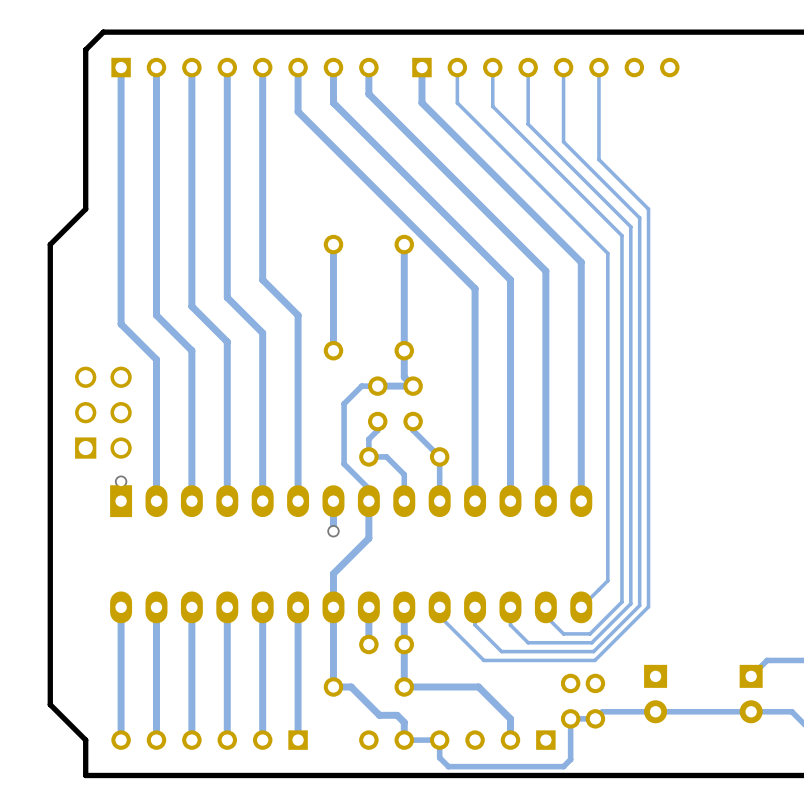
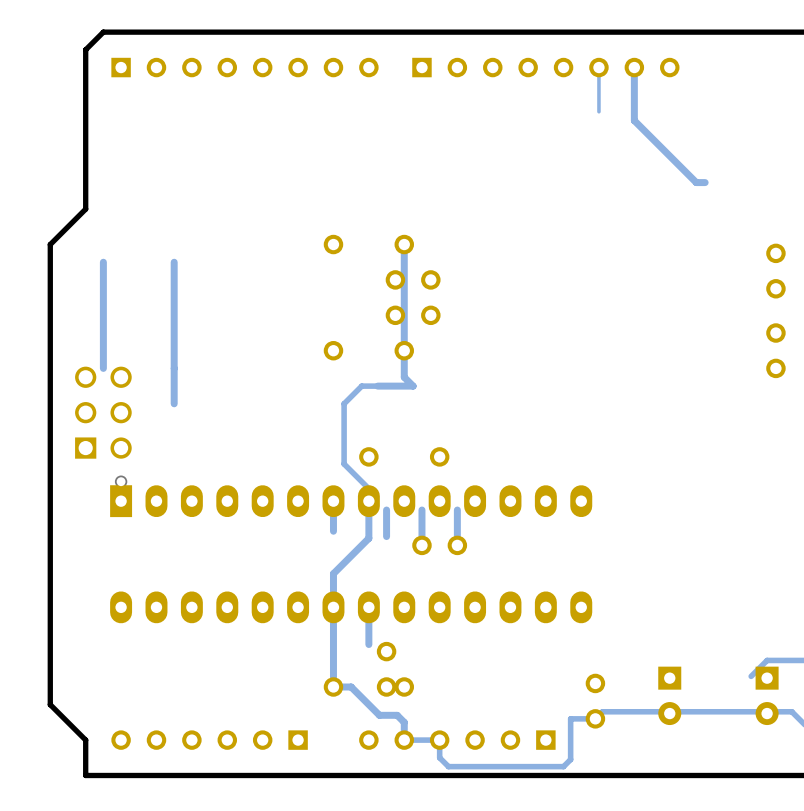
track: (121, 67) (121, 324) (156, 359) (156, 501) -> none
track: (156, 67) (156, 315) (191, 350) (191, 501) -> none
track: (191, 67) (191, 306) (227, 341) (227, 501) -> none
track: (227, 67) (227, 297) (262, 333) (262, 501) -> none
track: (262, 67) (262, 279) (298, 315) (298, 501) -> none
track: (298, 67) (298, 111) (475, 288) (475, 501) -> none
track: (333, 67) (333, 102) (510, 279) (510, 501) -> none
track: (368, 67) (368, 94) (545, 271) (545, 501) -> none
track: (421, 67) (421, 102) (581, 262) (581, 501) -> none
track: (457, 67) (457, 102) (607, 253) (607, 580) (581, 607) -> none
track: (492, 67) (492, 106) (621, 235) (621, 602) (590, 633) (563, 633) (545, 616) (545, 607) -> none
track: (528, 67) (528, 124) (630, 226) (630, 603) (591, 642) (528, 642) (510, 625) (510, 607) -> none
track: (563, 67) (563, 141) (639, 217) (639, 605) (593, 651) (501, 651) (475, 625) (475, 607) -> none
track: none -> (634, 67) (634, 120) (696, 182) (705, 182)
track: (598, 111) (598, 159) (648, 209) (648, 606) (594, 660) (483, 660) (439, 616) (439, 607) -> none
track: (333, 244) (333, 350) -> (103, 262) (103, 368)
track: none -> (174, 262) (174, 403)
part: none -> (775, 271)
part: none -> (395, 297)
part: none -> (430, 297)
part: none -> (775, 350)
part: (377, 403) -> none
part: (413, 403) -> none
track: (377, 421) (377, 430) (368, 439) (368, 456) (386, 456) (404, 474) (404, 501) -> none
track: (413, 421) (413, 430) (439, 456) (439, 501) -> none
track: none -> (386, 510) (386, 536)
track: none -> (421, 510) (421, 545)
track: none -> (457, 510) (457, 545)
via: (333, 531) -> none
part: none -> (439, 545)
track: (121, 607) (121, 740) -> none
track: (156, 607) (156, 740) -> none
track: (191, 607) (191, 740) -> none
track: (227, 607) (227, 740) -> none
track: (262, 607) (262, 740) -> none
track: (298, 607) (298, 740) -> none
track: (404, 607) (404, 687) (478, 687) (510, 718) (510, 740) -> none
part rotation: 0° (386, 644) -> 90° clockwise (386, 669)
part position: (655, 694) -> (669, 695)
part position: (751, 694) -> (767, 695)
part: (570, 701) -> none

